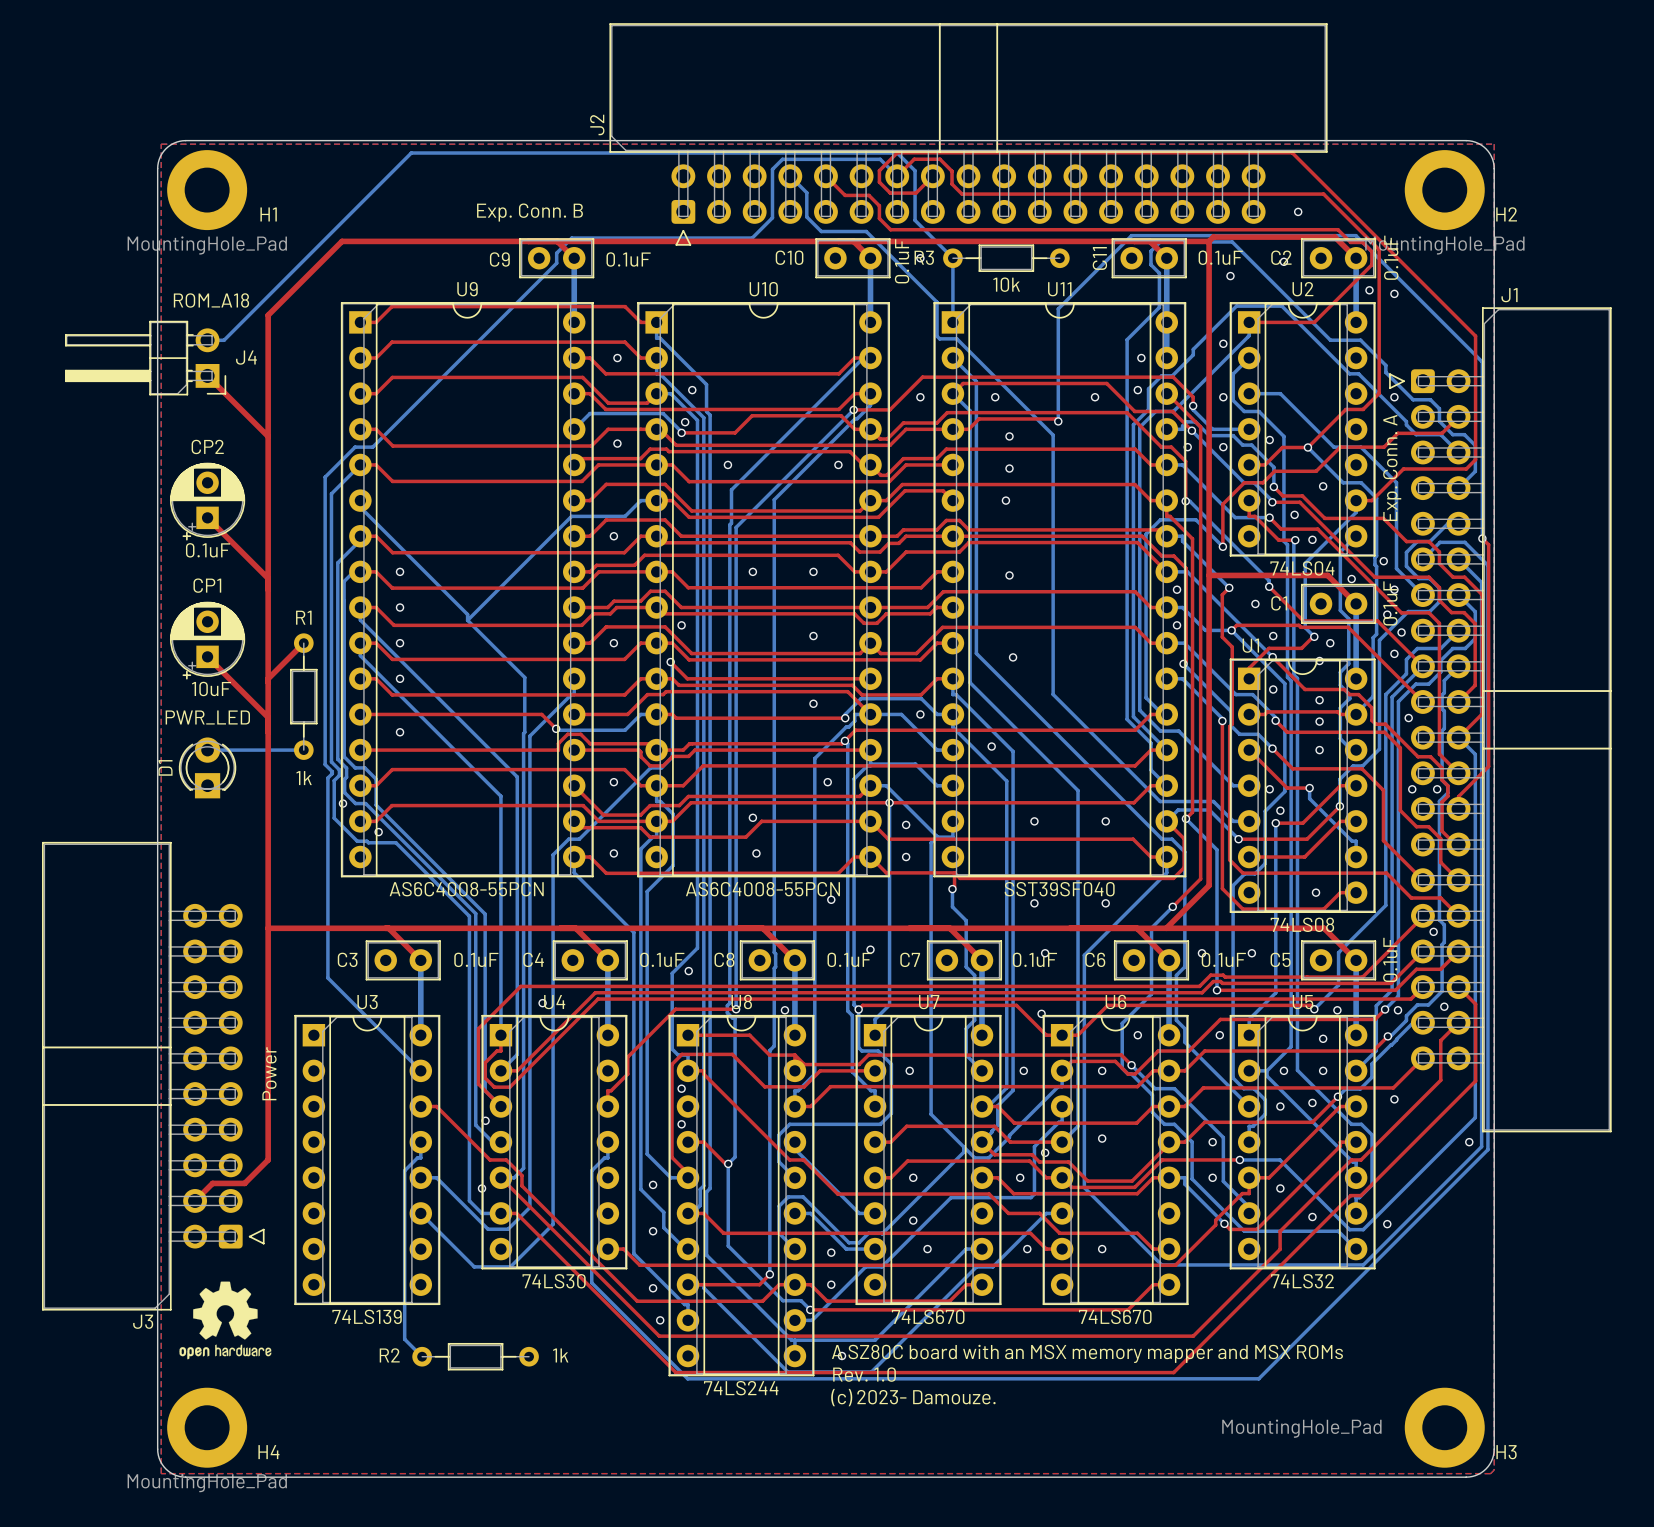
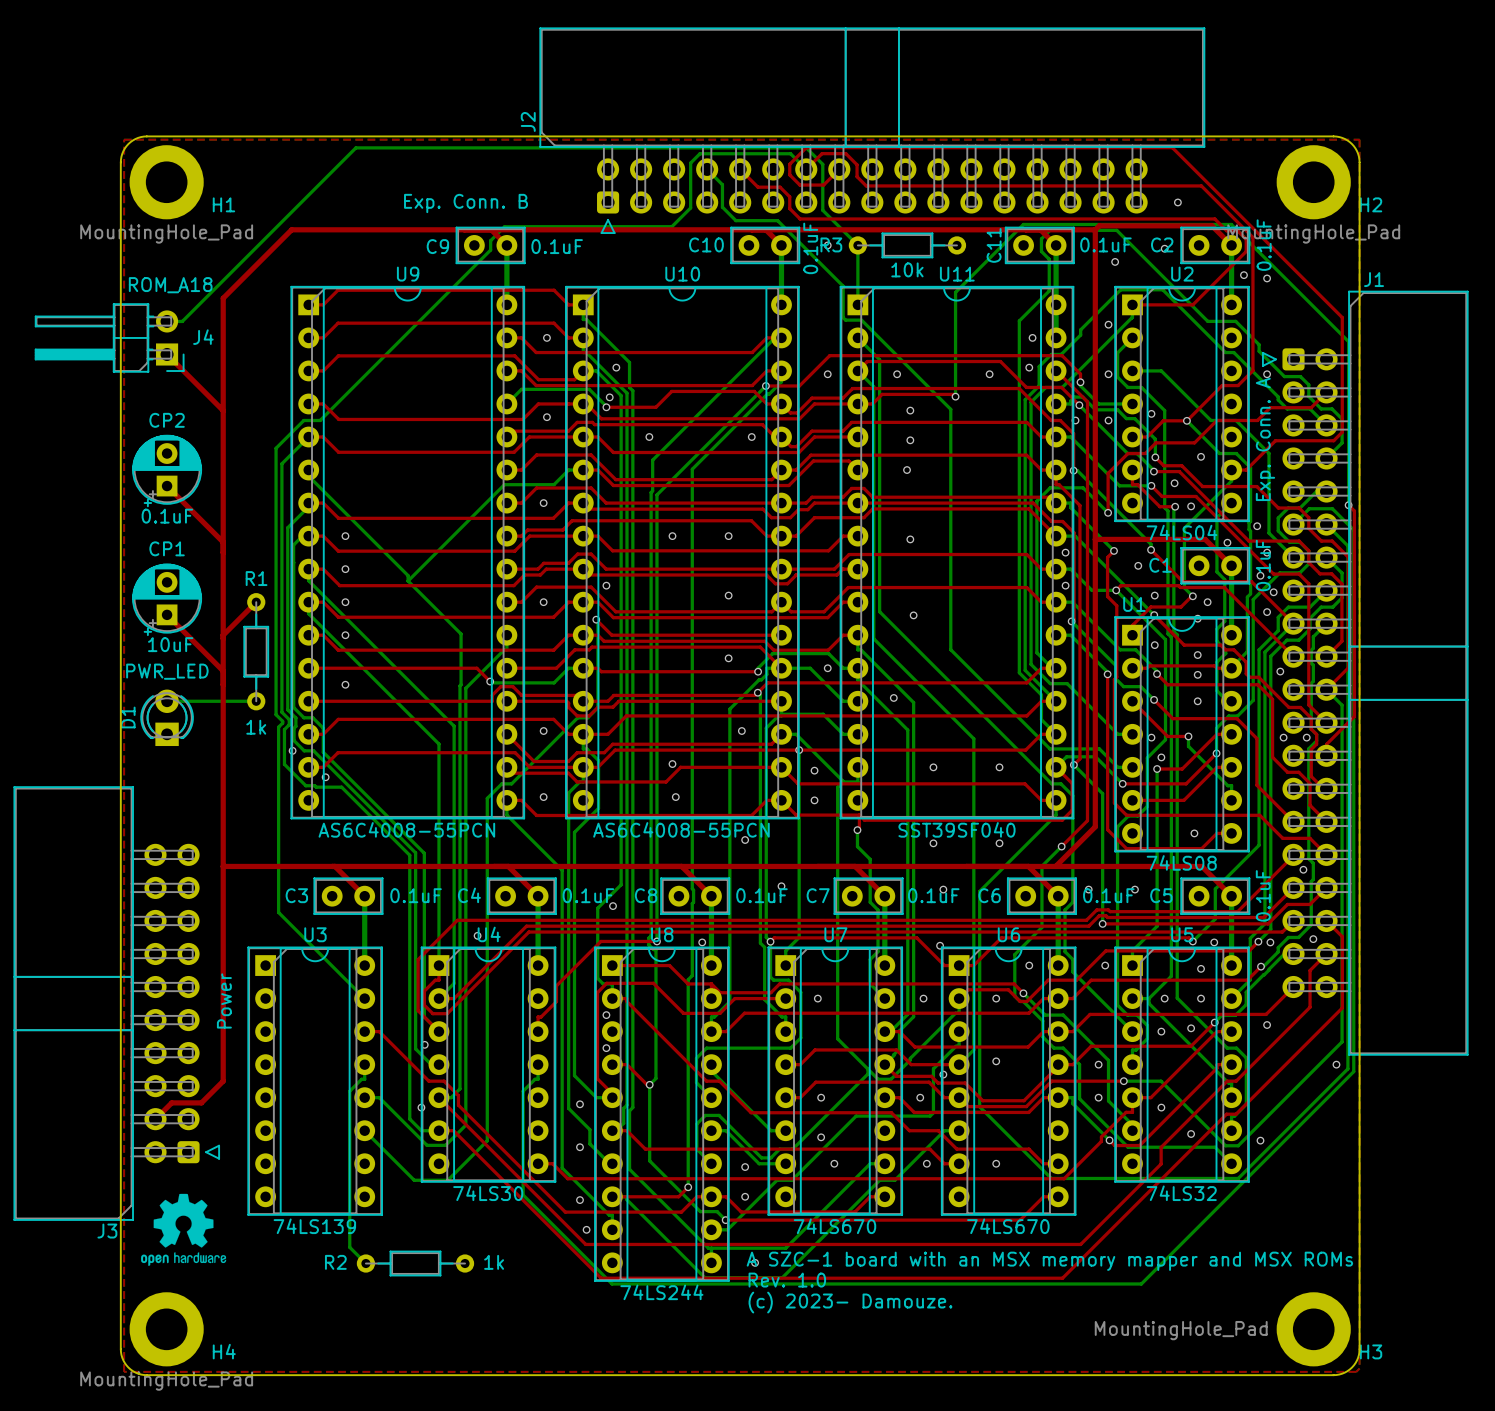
text: A SZ80C board with an MSX memory mapper and MSX ROMs (1087, 1353) -> A SZC-1 board with an MSX memory mapper and MSX ROMs (1049, 1261)

